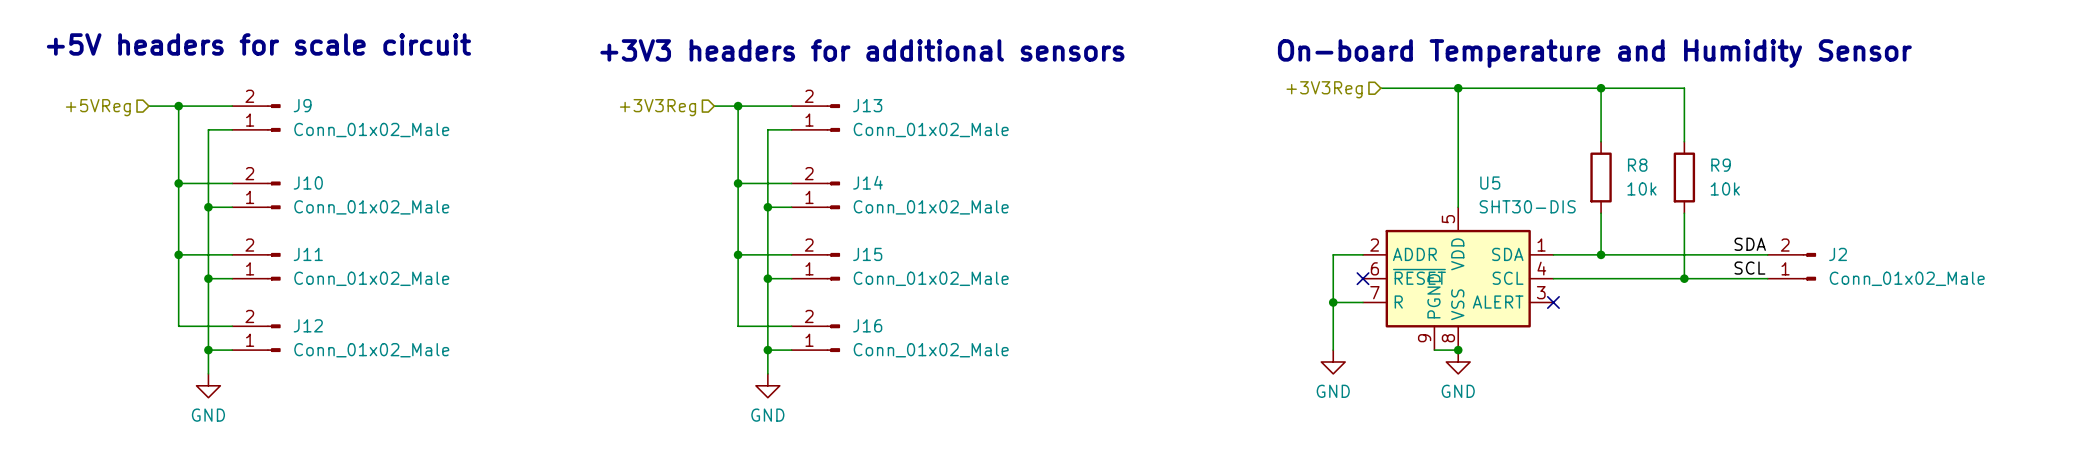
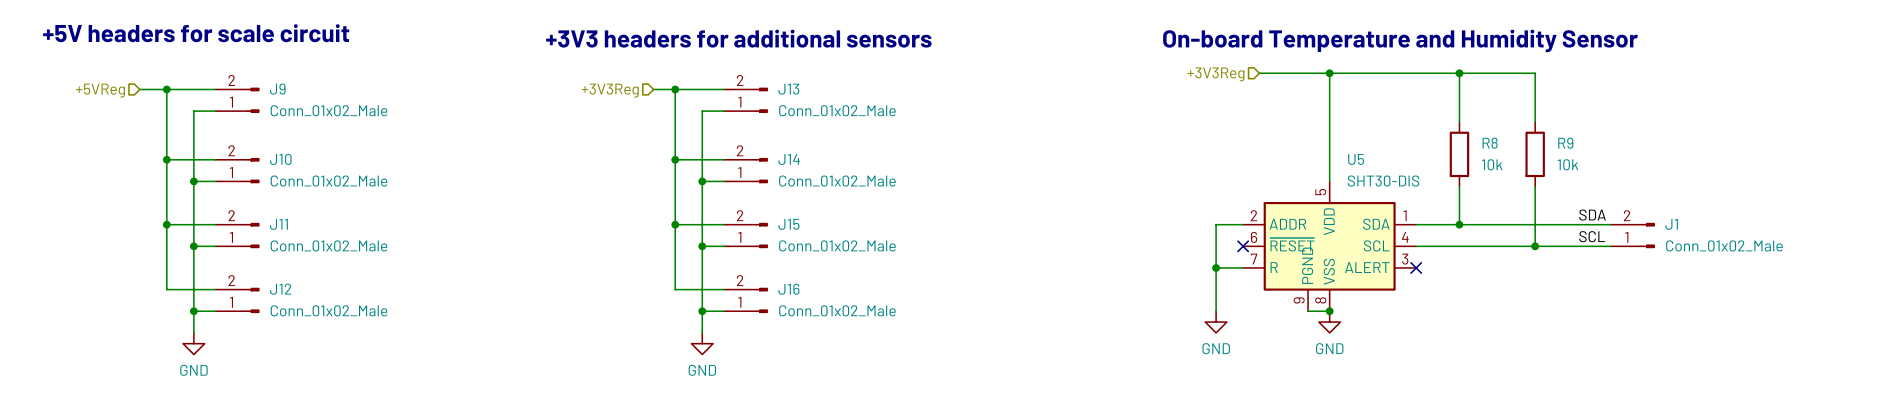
J2 name: J2 (1838, 254) -> J1 (1671, 224)

